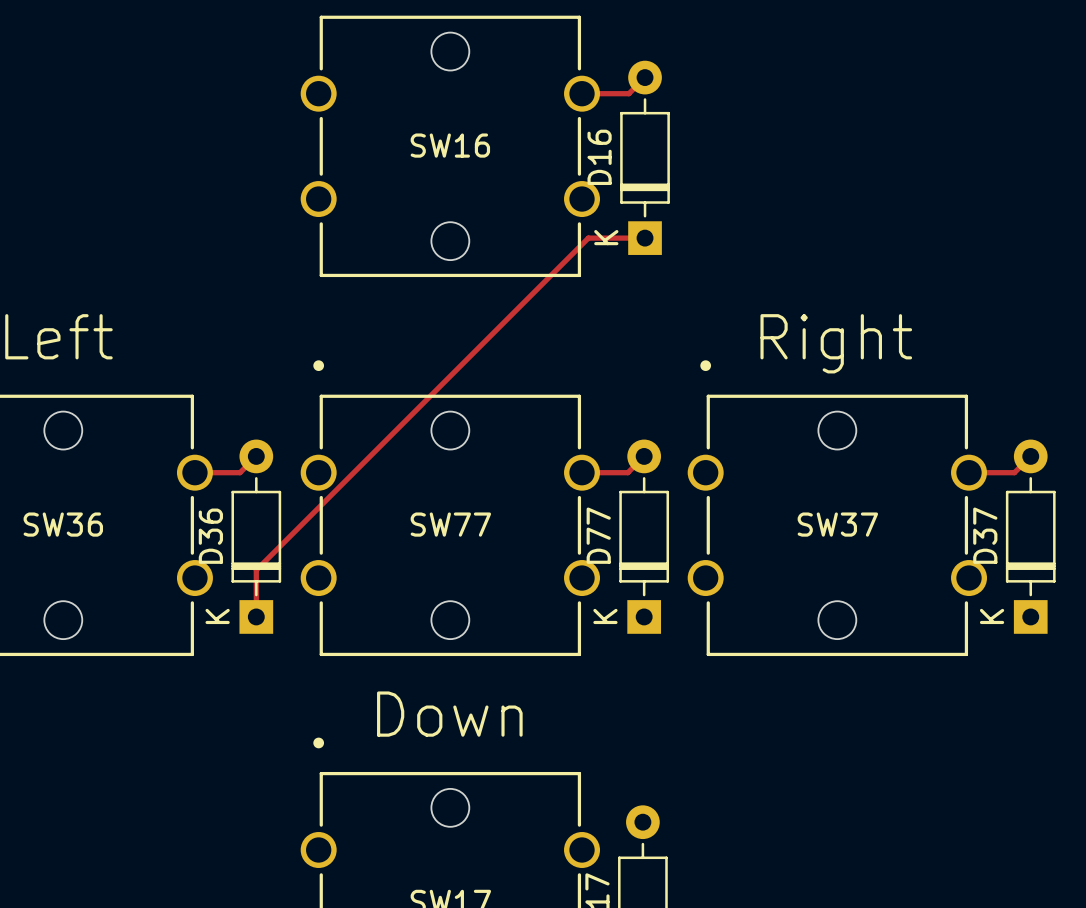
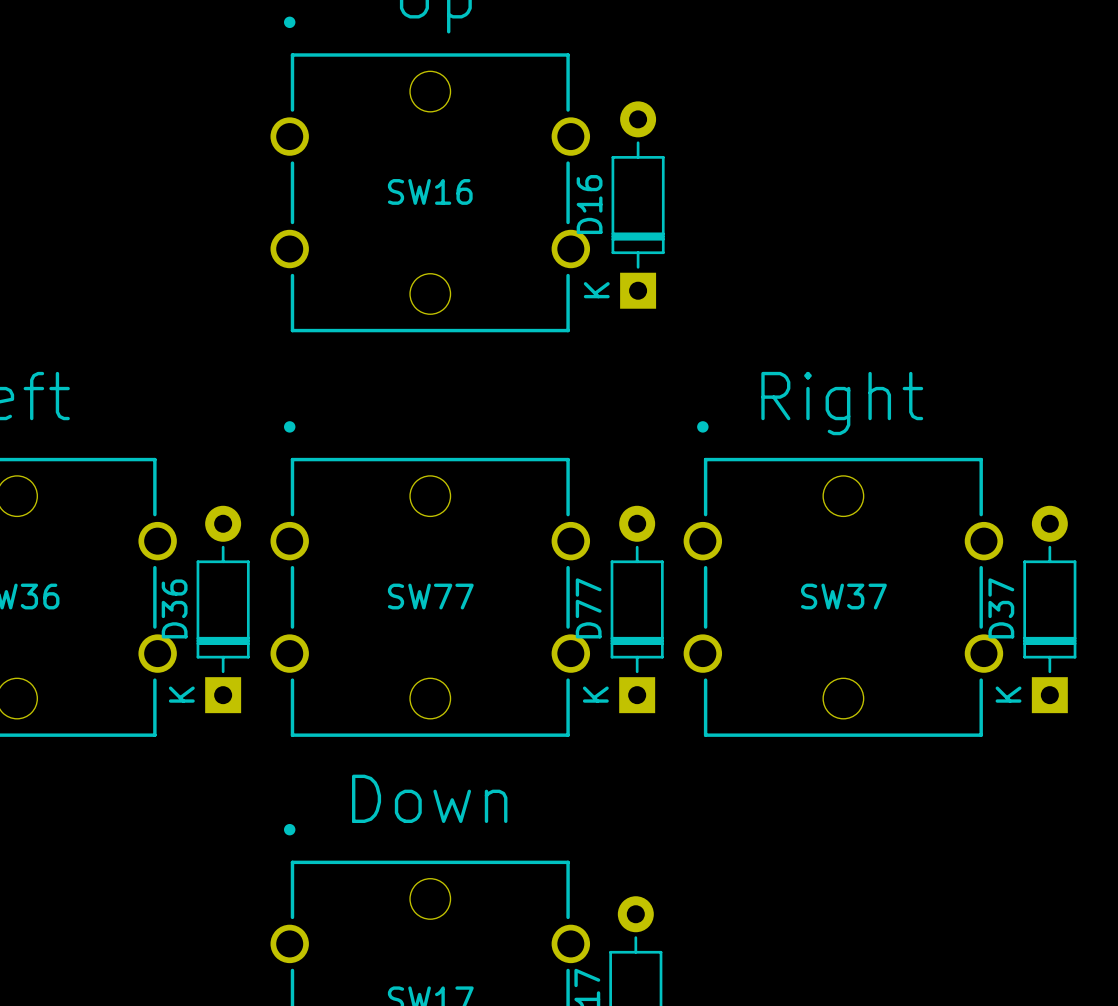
track: (645, 77) (628, 93) (582, 93) -> none
track: (645, 238) (588, 238) (256, 570) (256, 616) -> none
track: (256, 456) (240, 472) (194, 472) -> none
track: (644, 456) (627, 472) (582, 472) -> none
track: (1030, 456) (1014, 472) (969, 472) -> none

